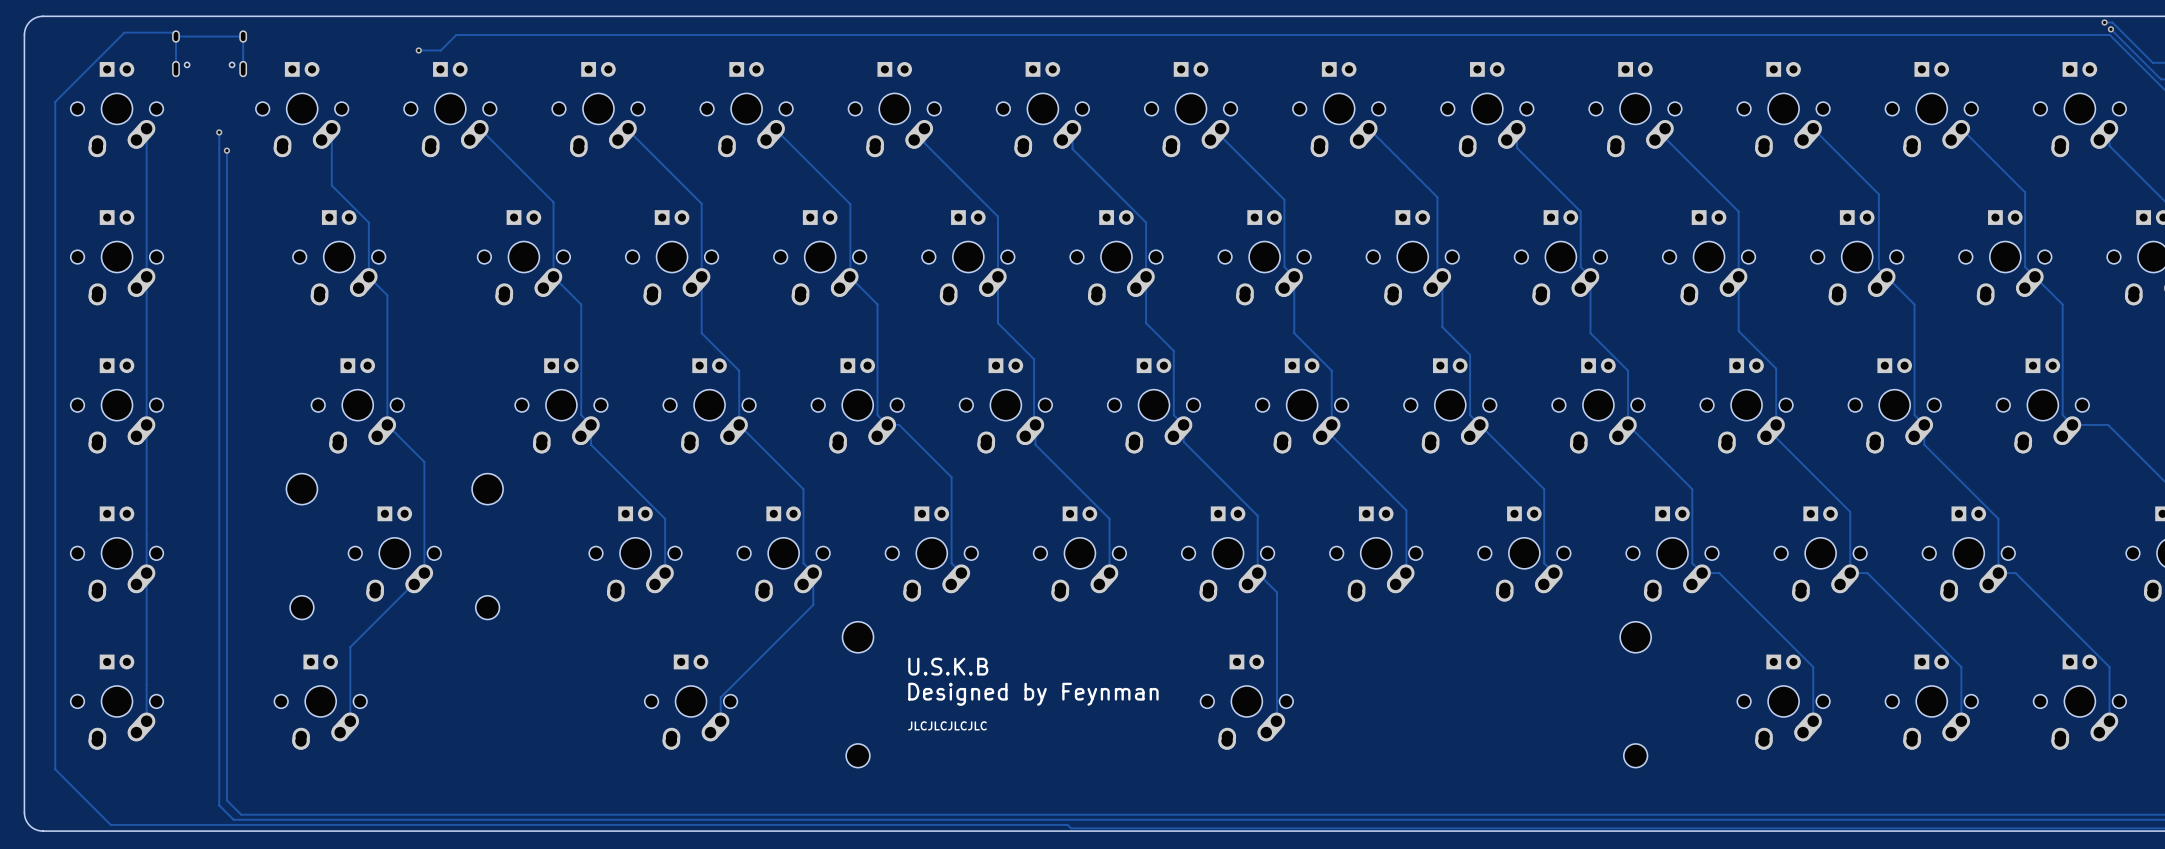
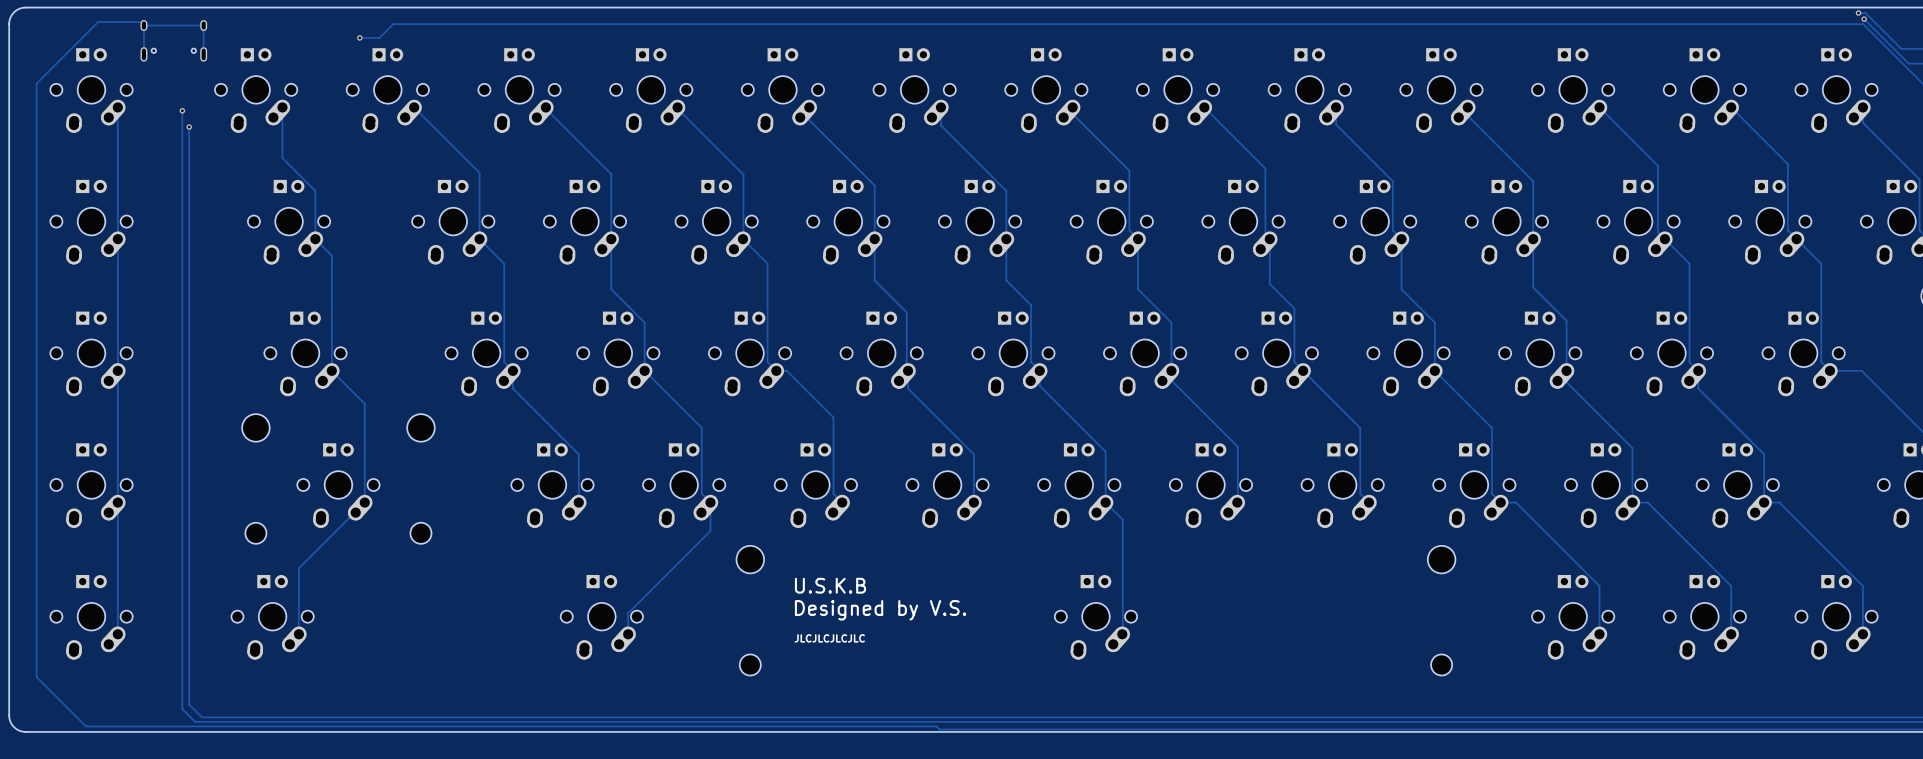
text: Designed by Feynman (1033, 694) -> Designed by V.S. (880, 610)

